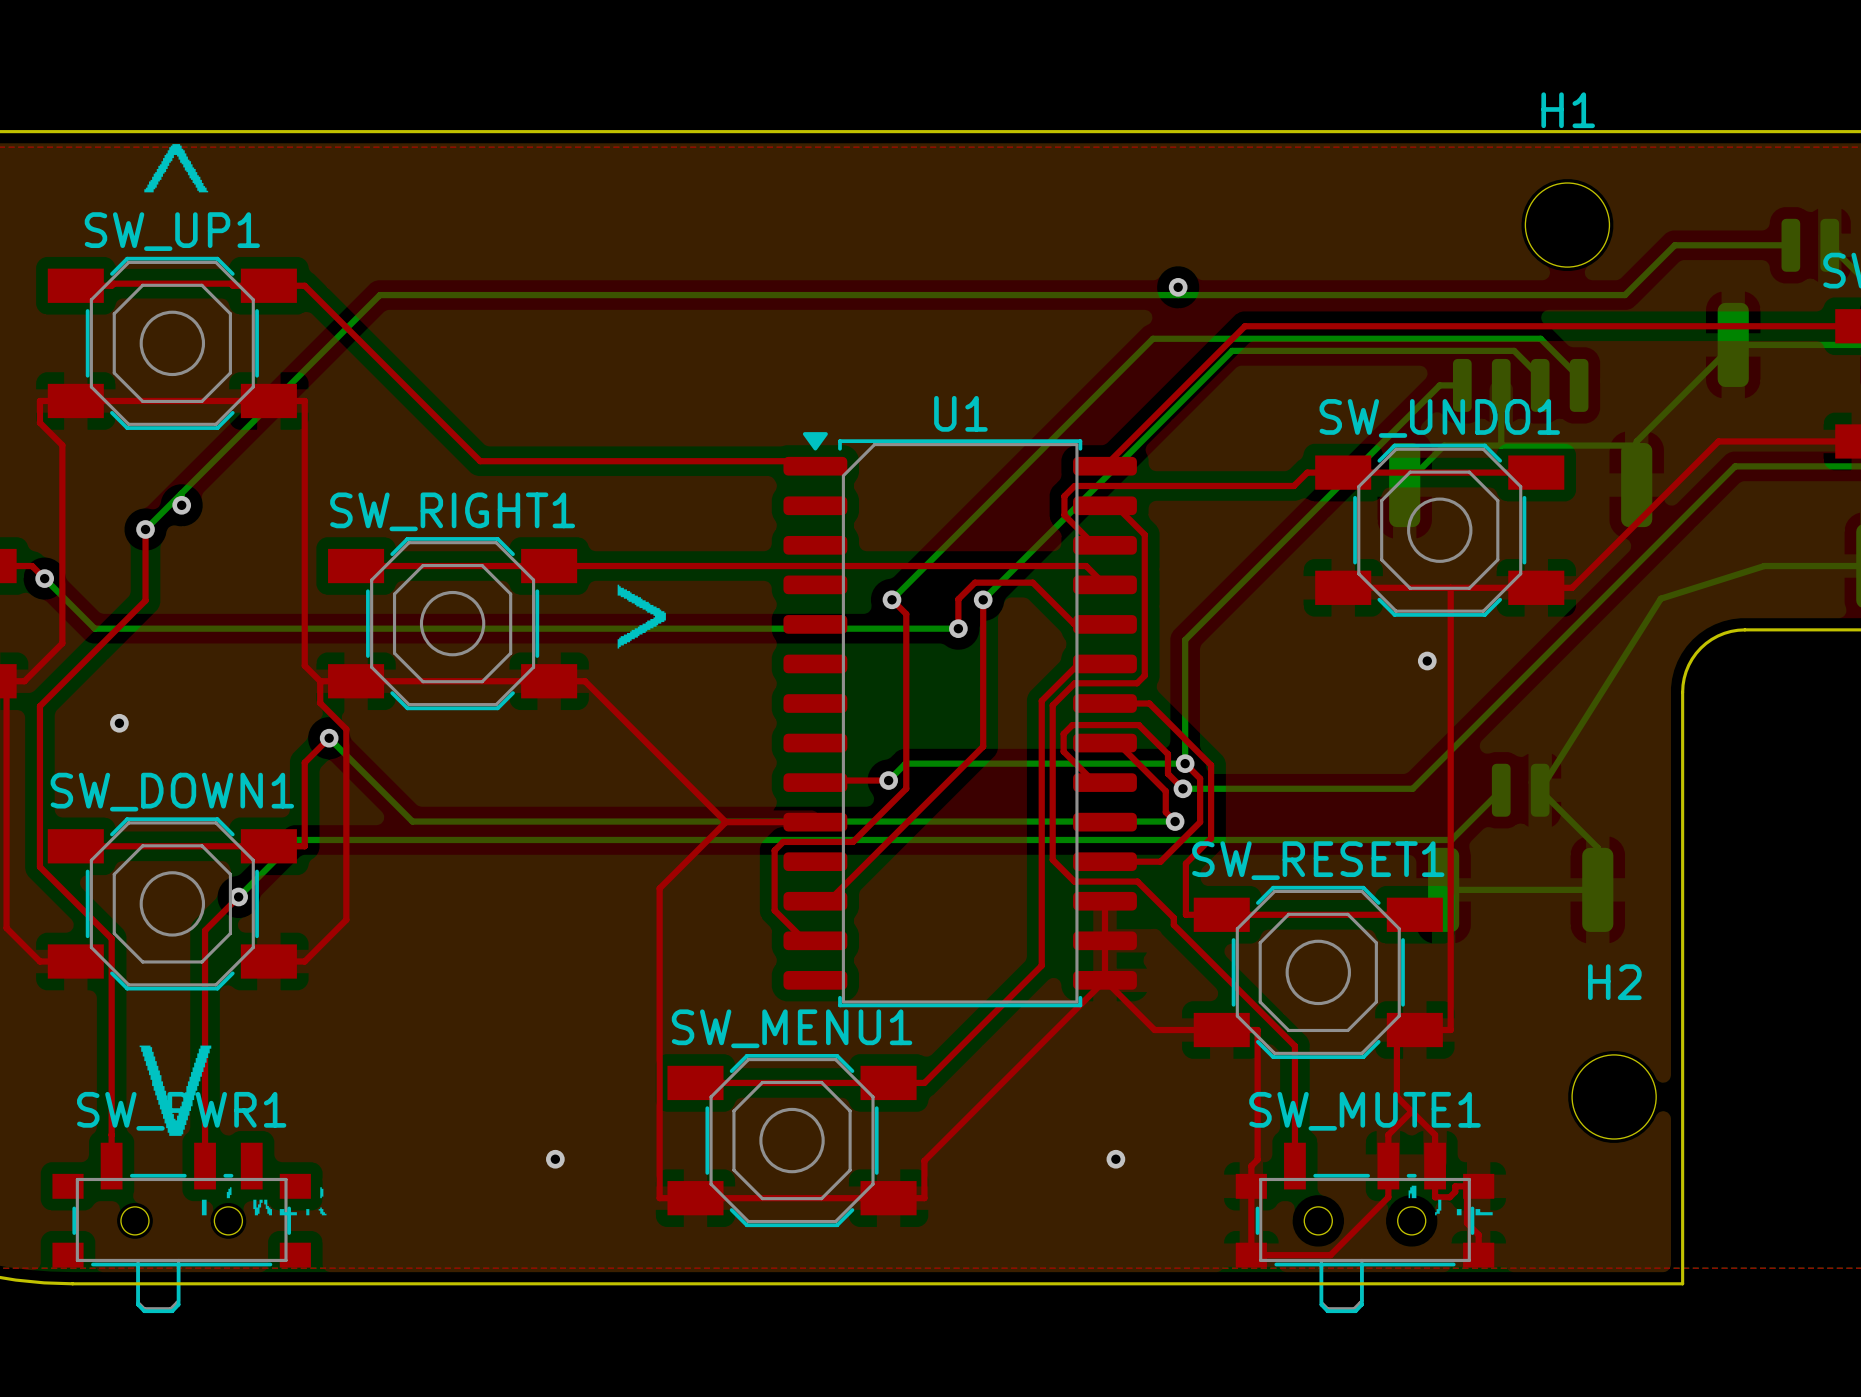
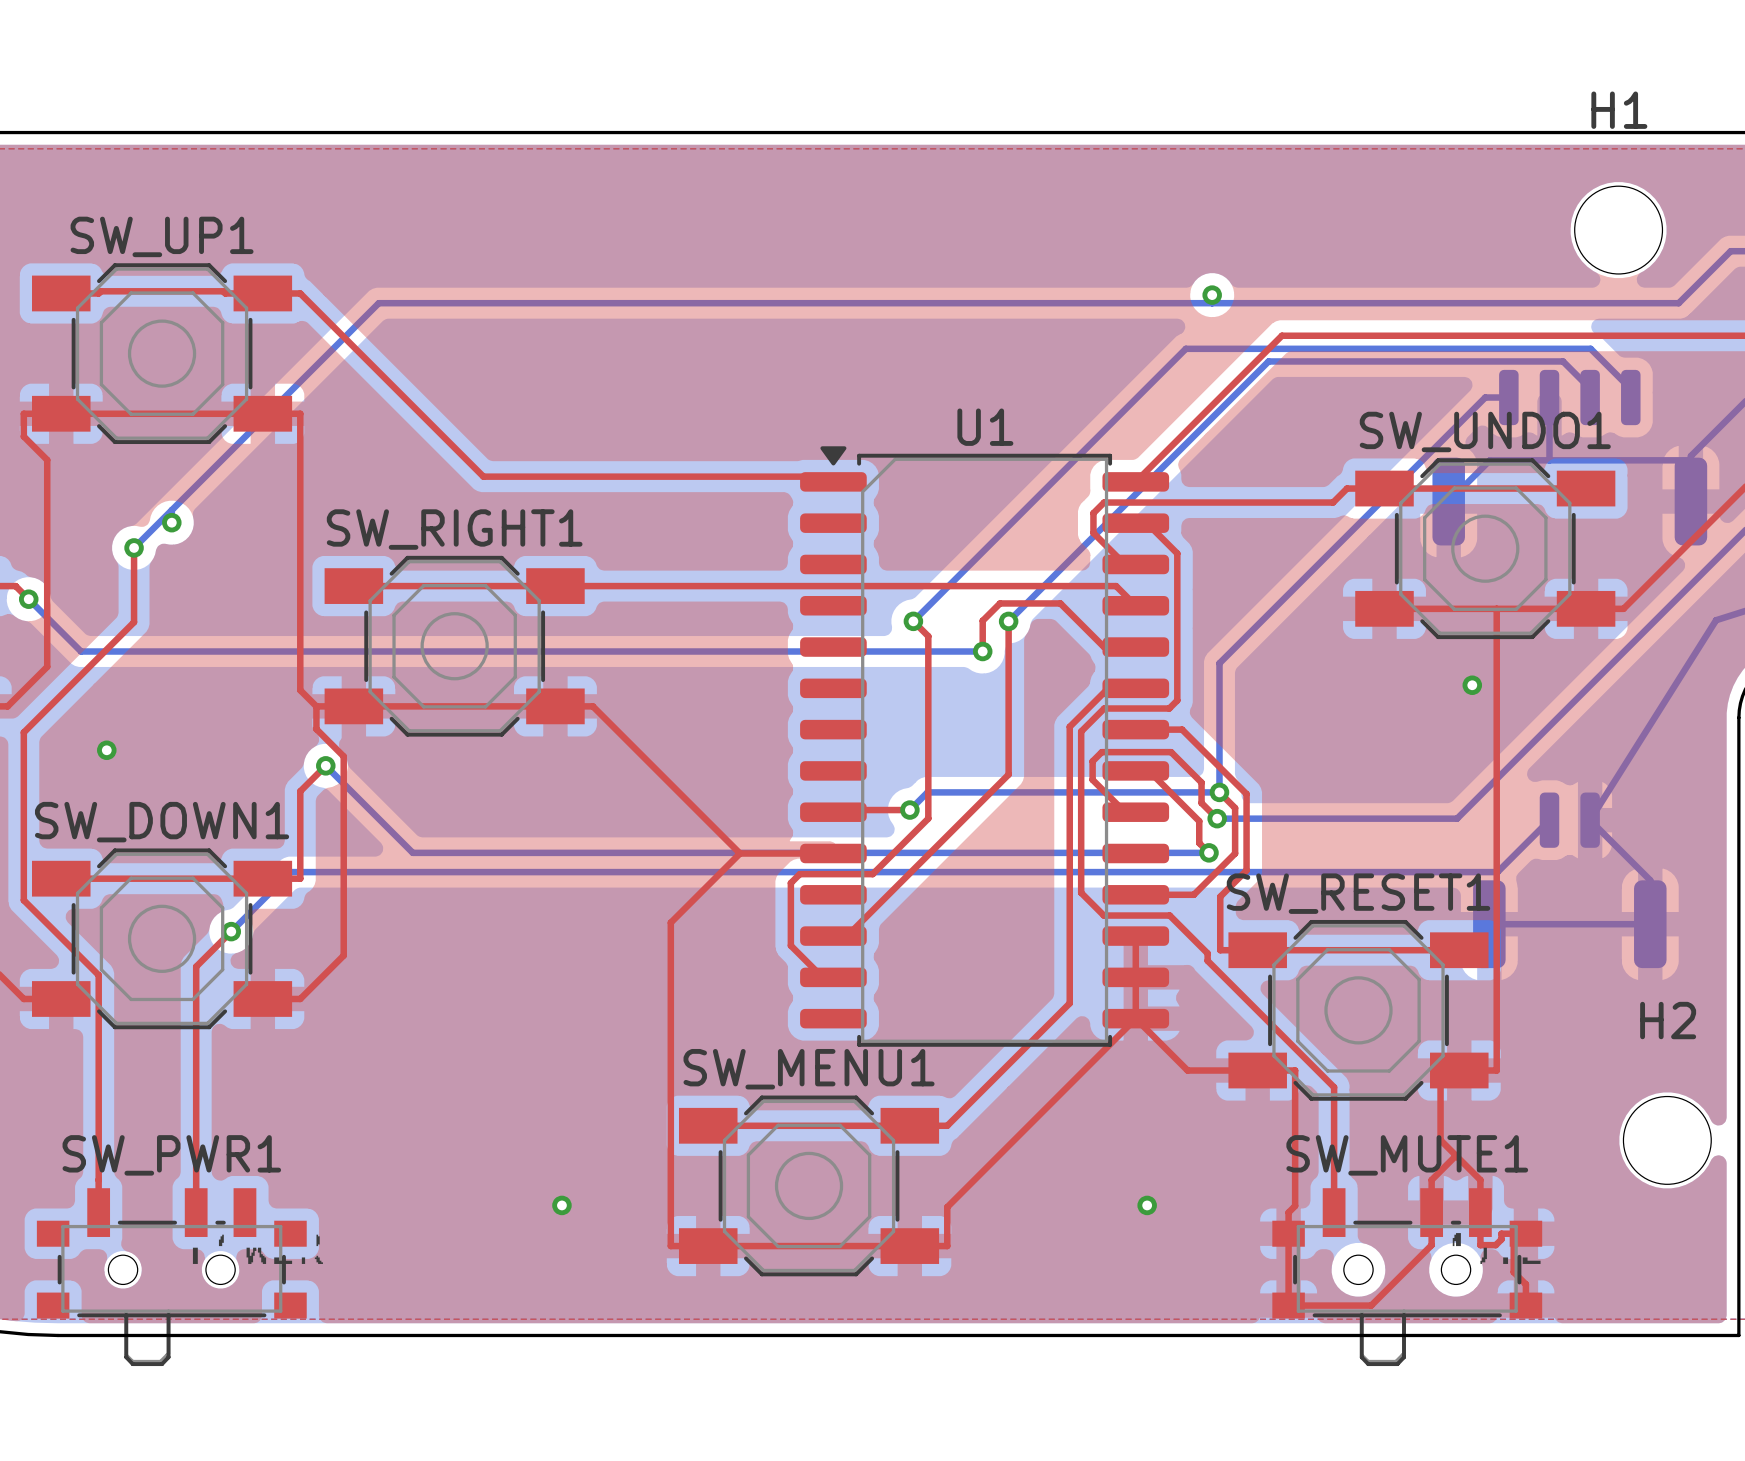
drawing: [144, 144, 209, 193] -> none
drawing: [617, 584, 666, 649] -> none
drawing: [139, 1045, 212, 1136] -> none

